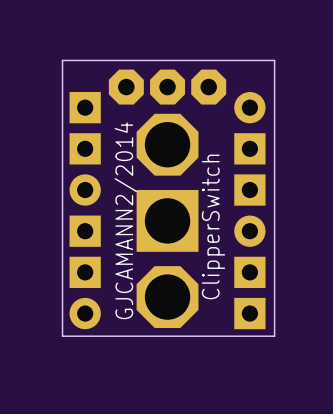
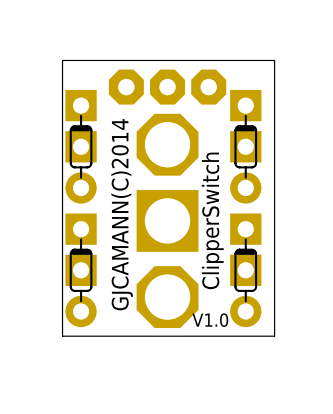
part footprint: [69, 92, 101, 206] -> [65, 89, 97, 204]
part footprint: [234, 92, 266, 206] -> [230, 89, 262, 204]
part footprint: [69, 215, 101, 330] -> [65, 213, 97, 328]
part footprint: [234, 215, 266, 330] -> [230, 213, 262, 328]
text: GJCAMANN2/2014 (125, 220) -> GJCAMANN(C)2014 (122, 214)
text: none -> V1.0 (210, 320)

